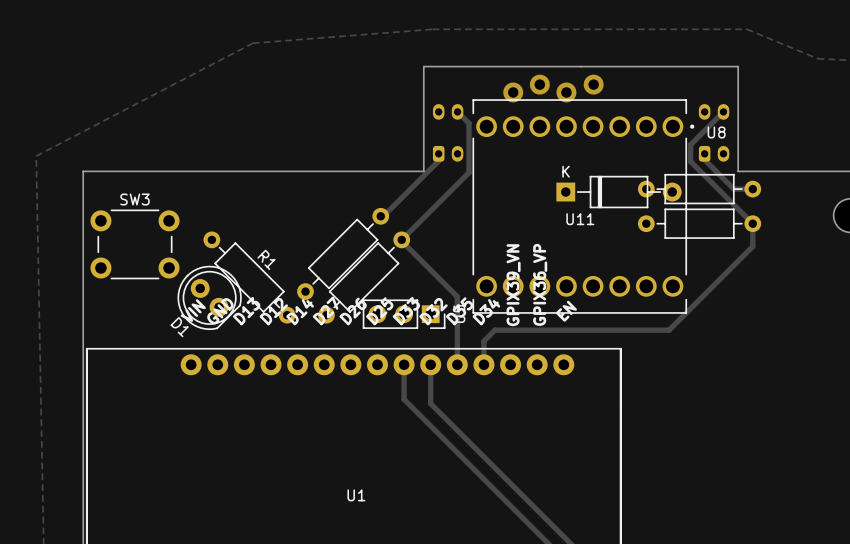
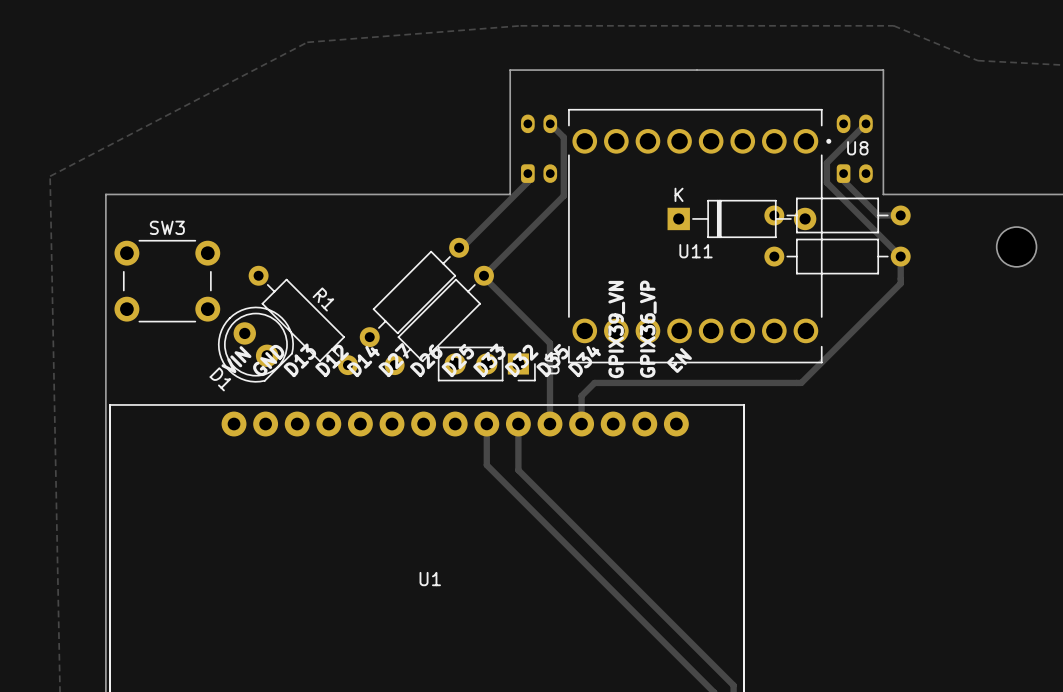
via: (539, 84) -> none
via: (593, 84) -> none
via: (513, 92) -> none
via: (566, 92) -> none

